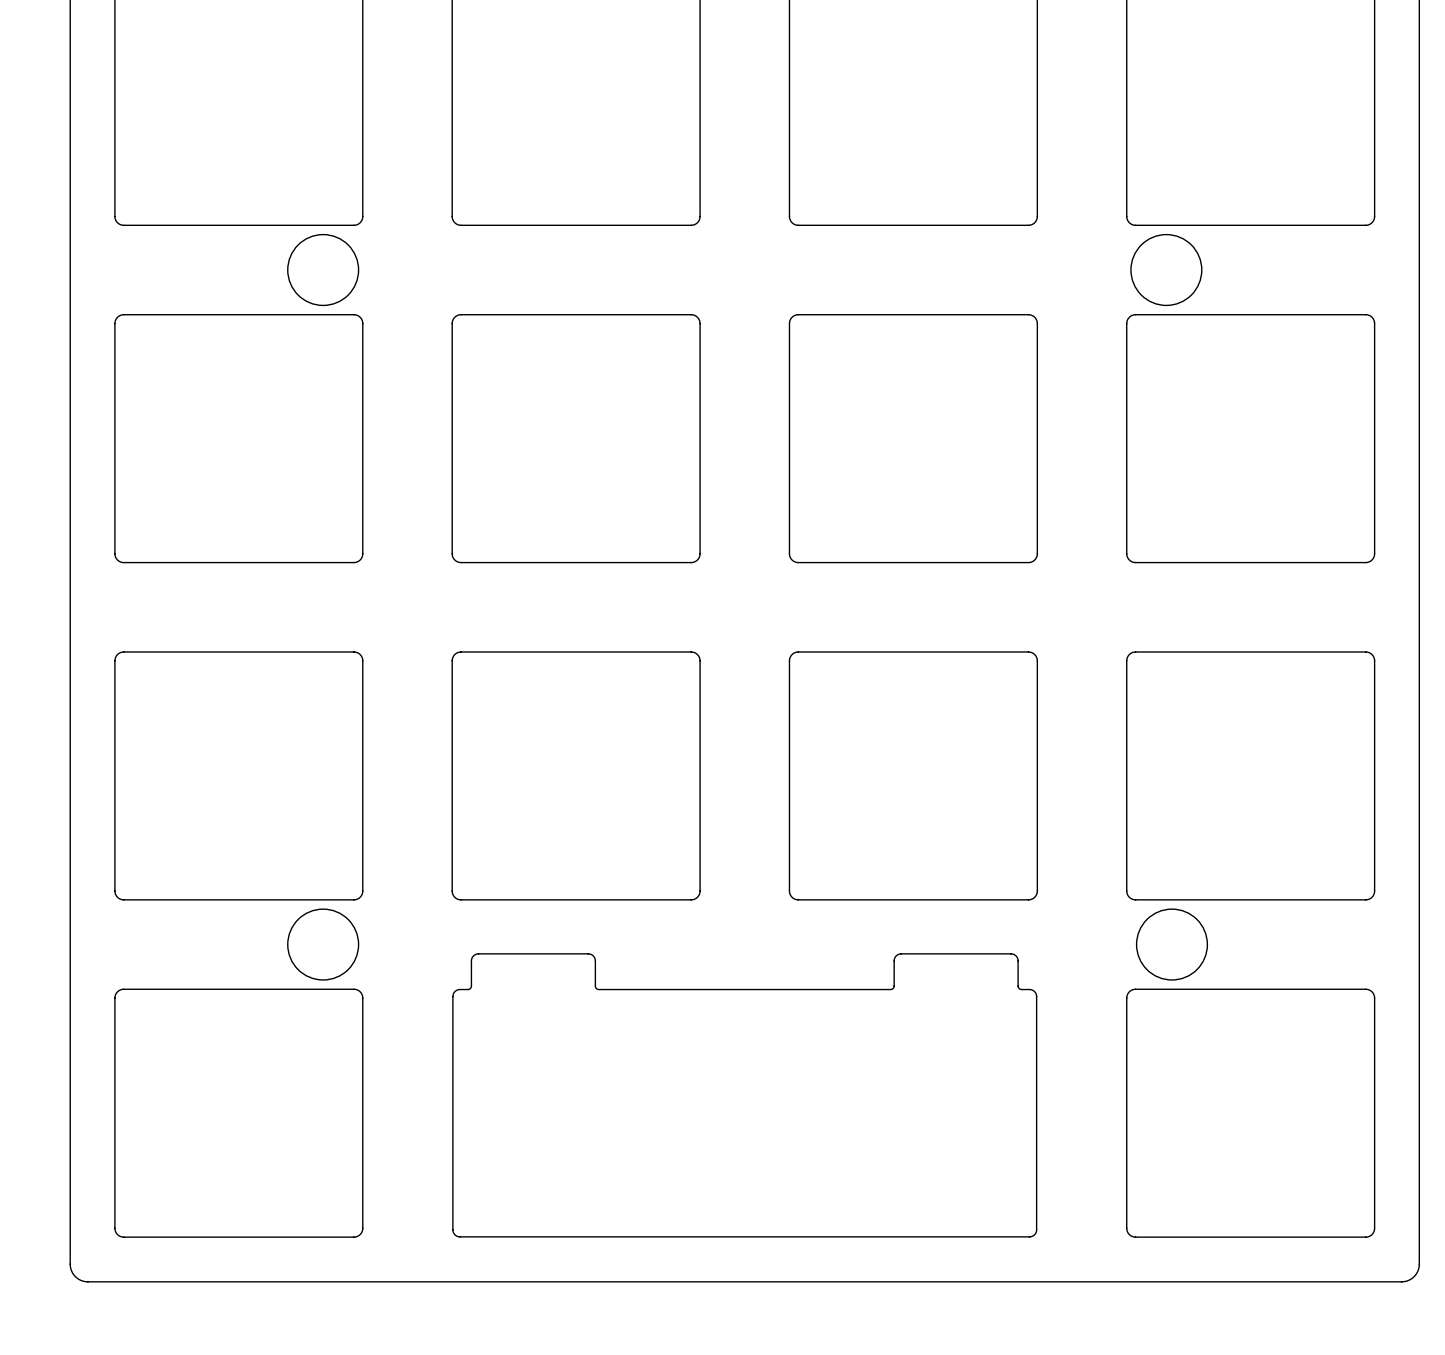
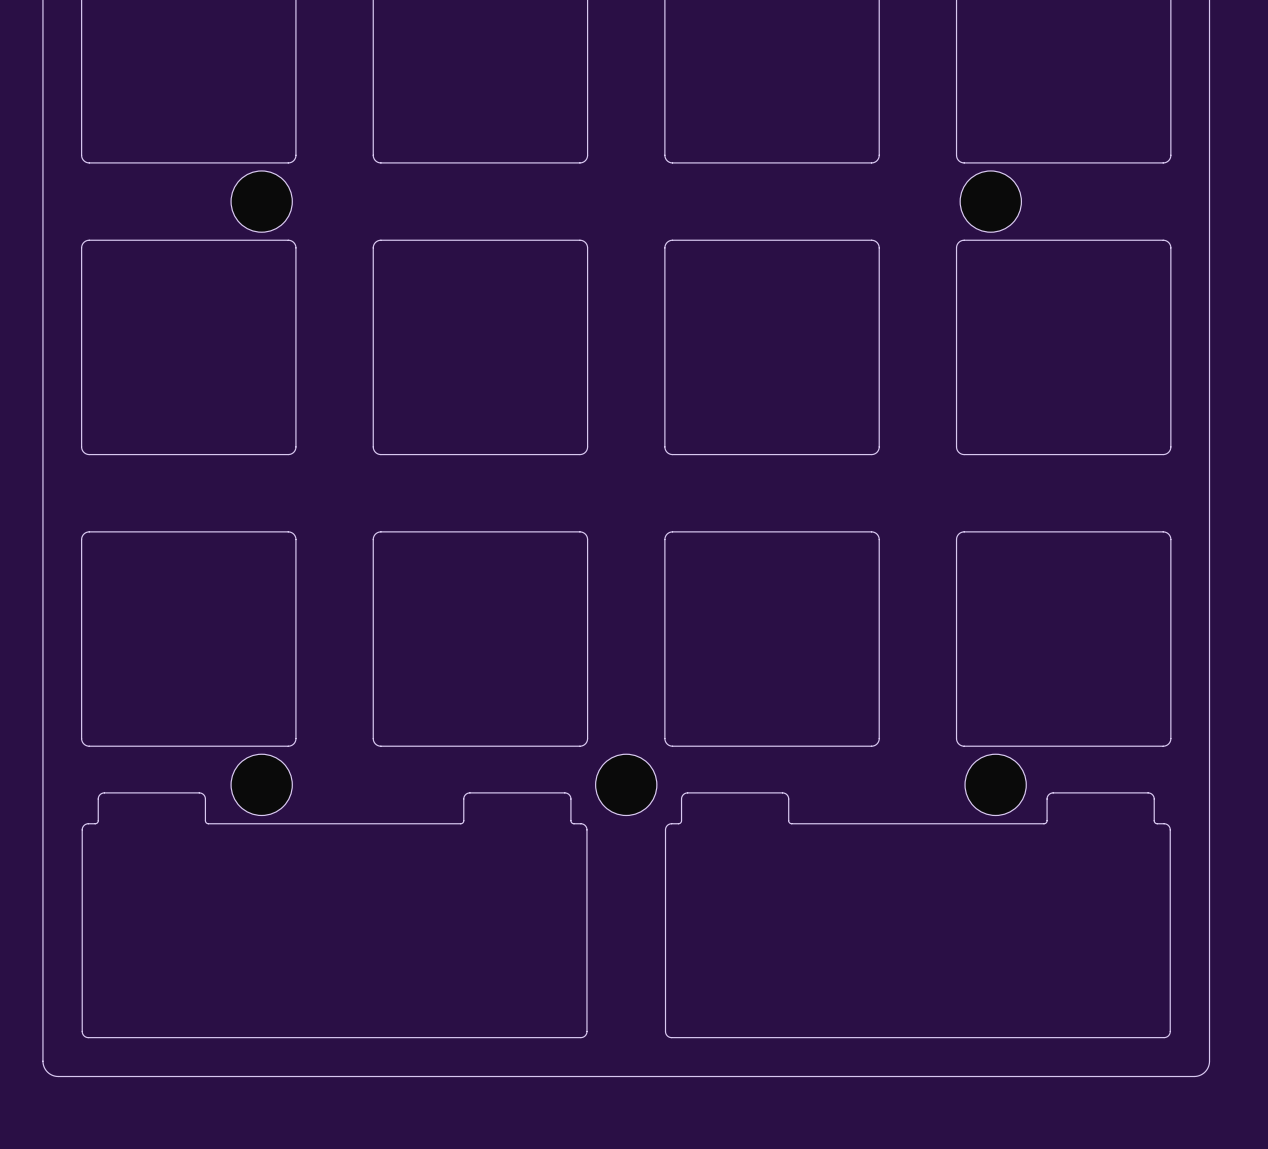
part: none -> (626, 784)
drawing: none -> [81, 792, 588, 1039]
drawing: [452, 953, 1038, 1238] -> none
drawing: none -> [665, 792, 1171, 1039]
drawing: [114, 988, 364, 1238] -> none
drawing: [1126, 988, 1376, 1238] -> none

